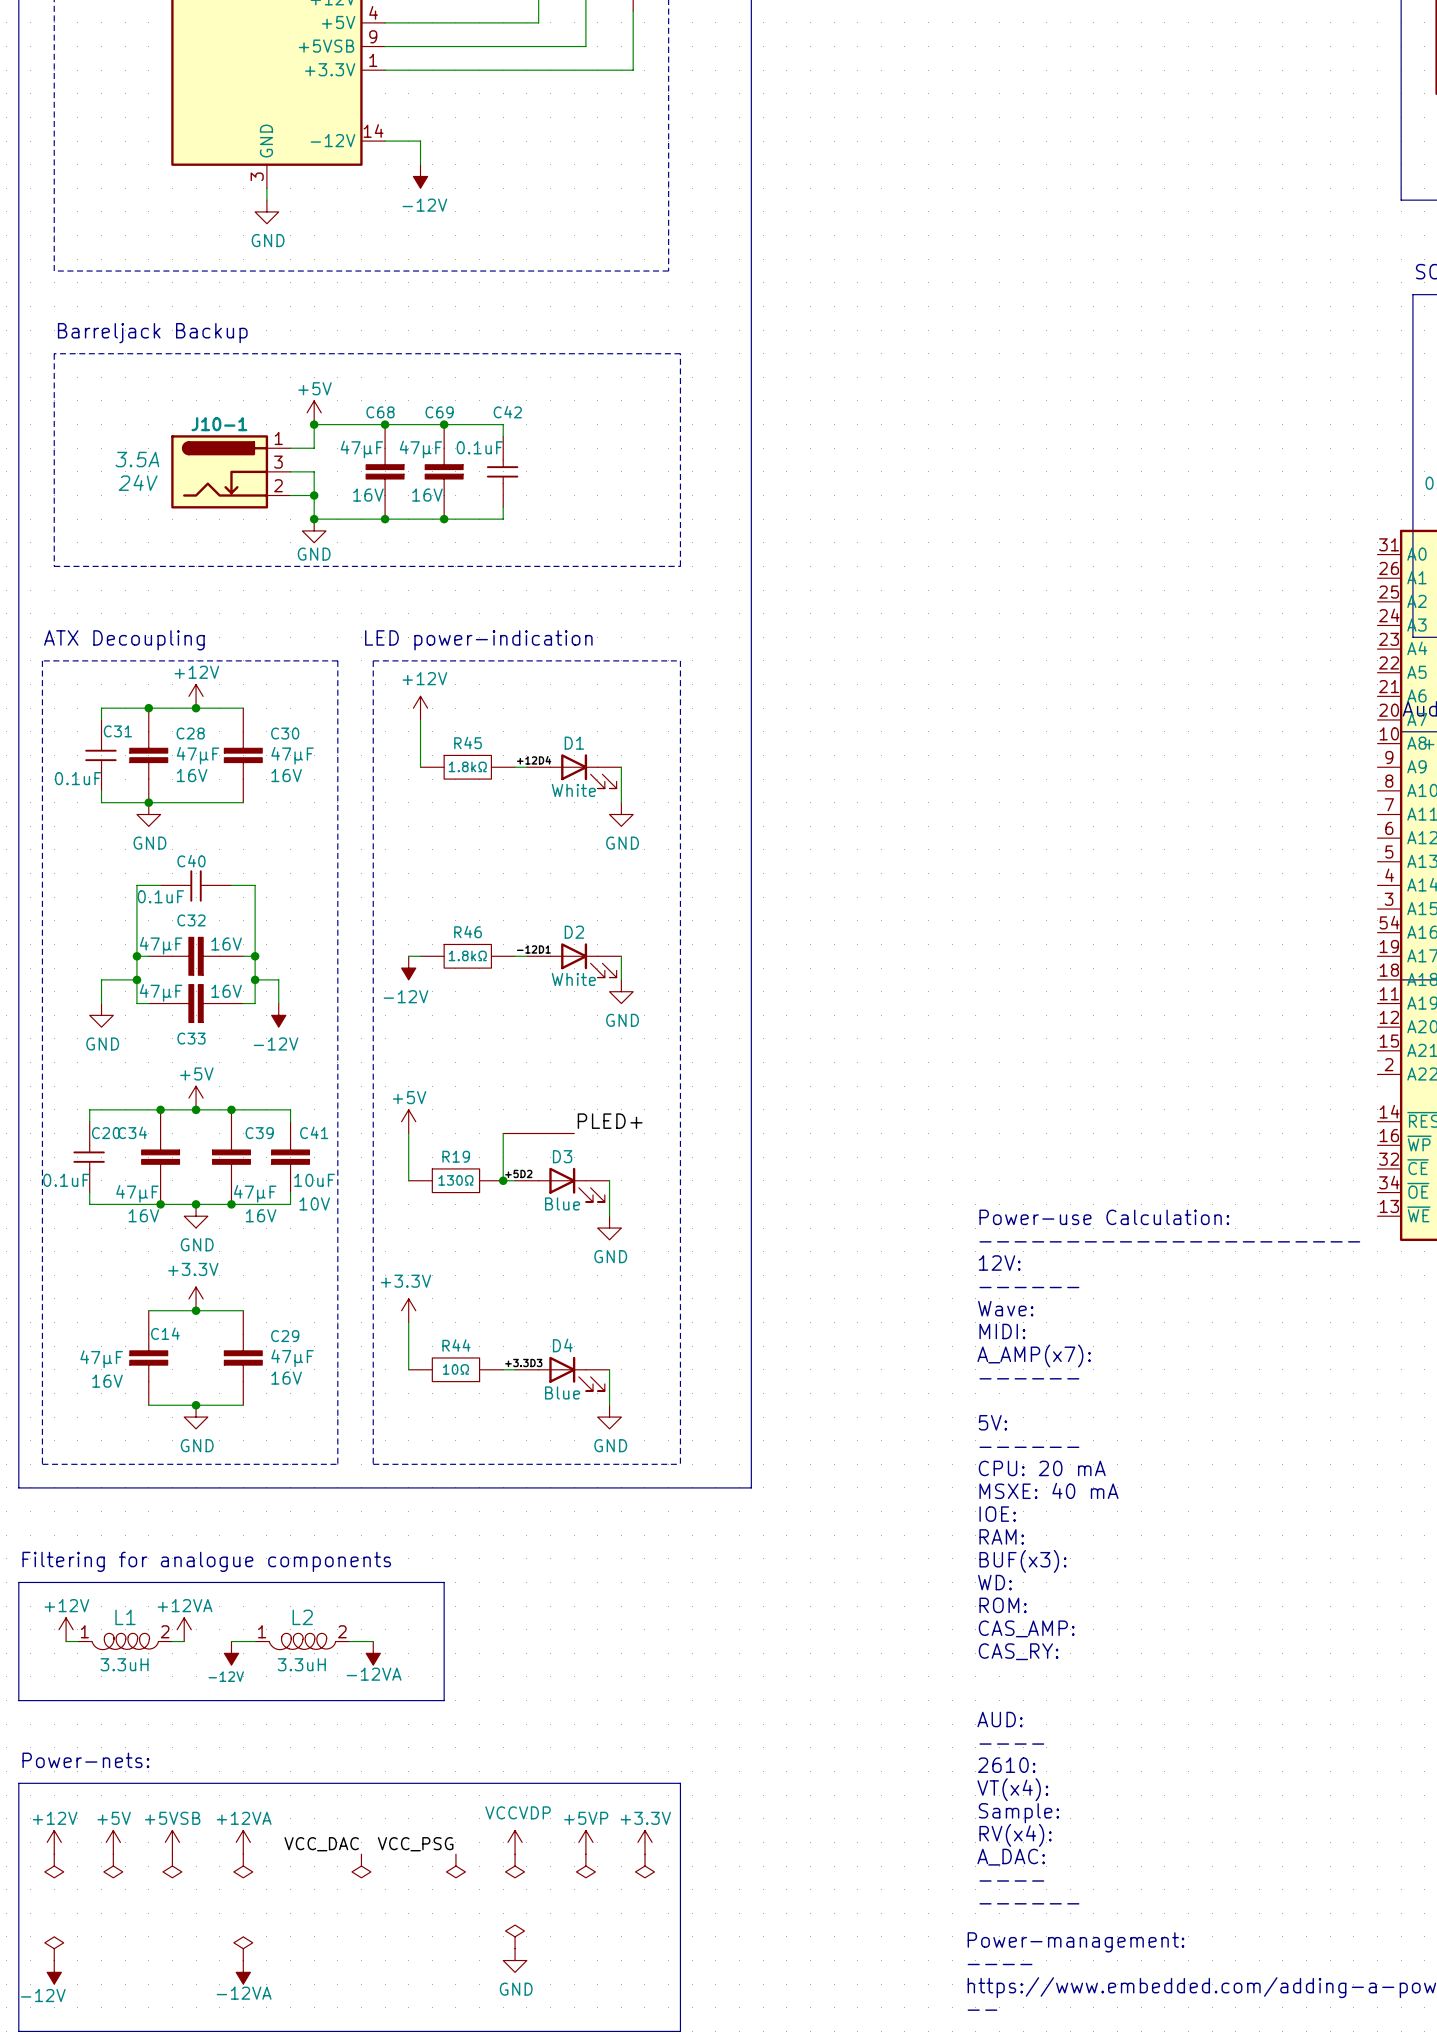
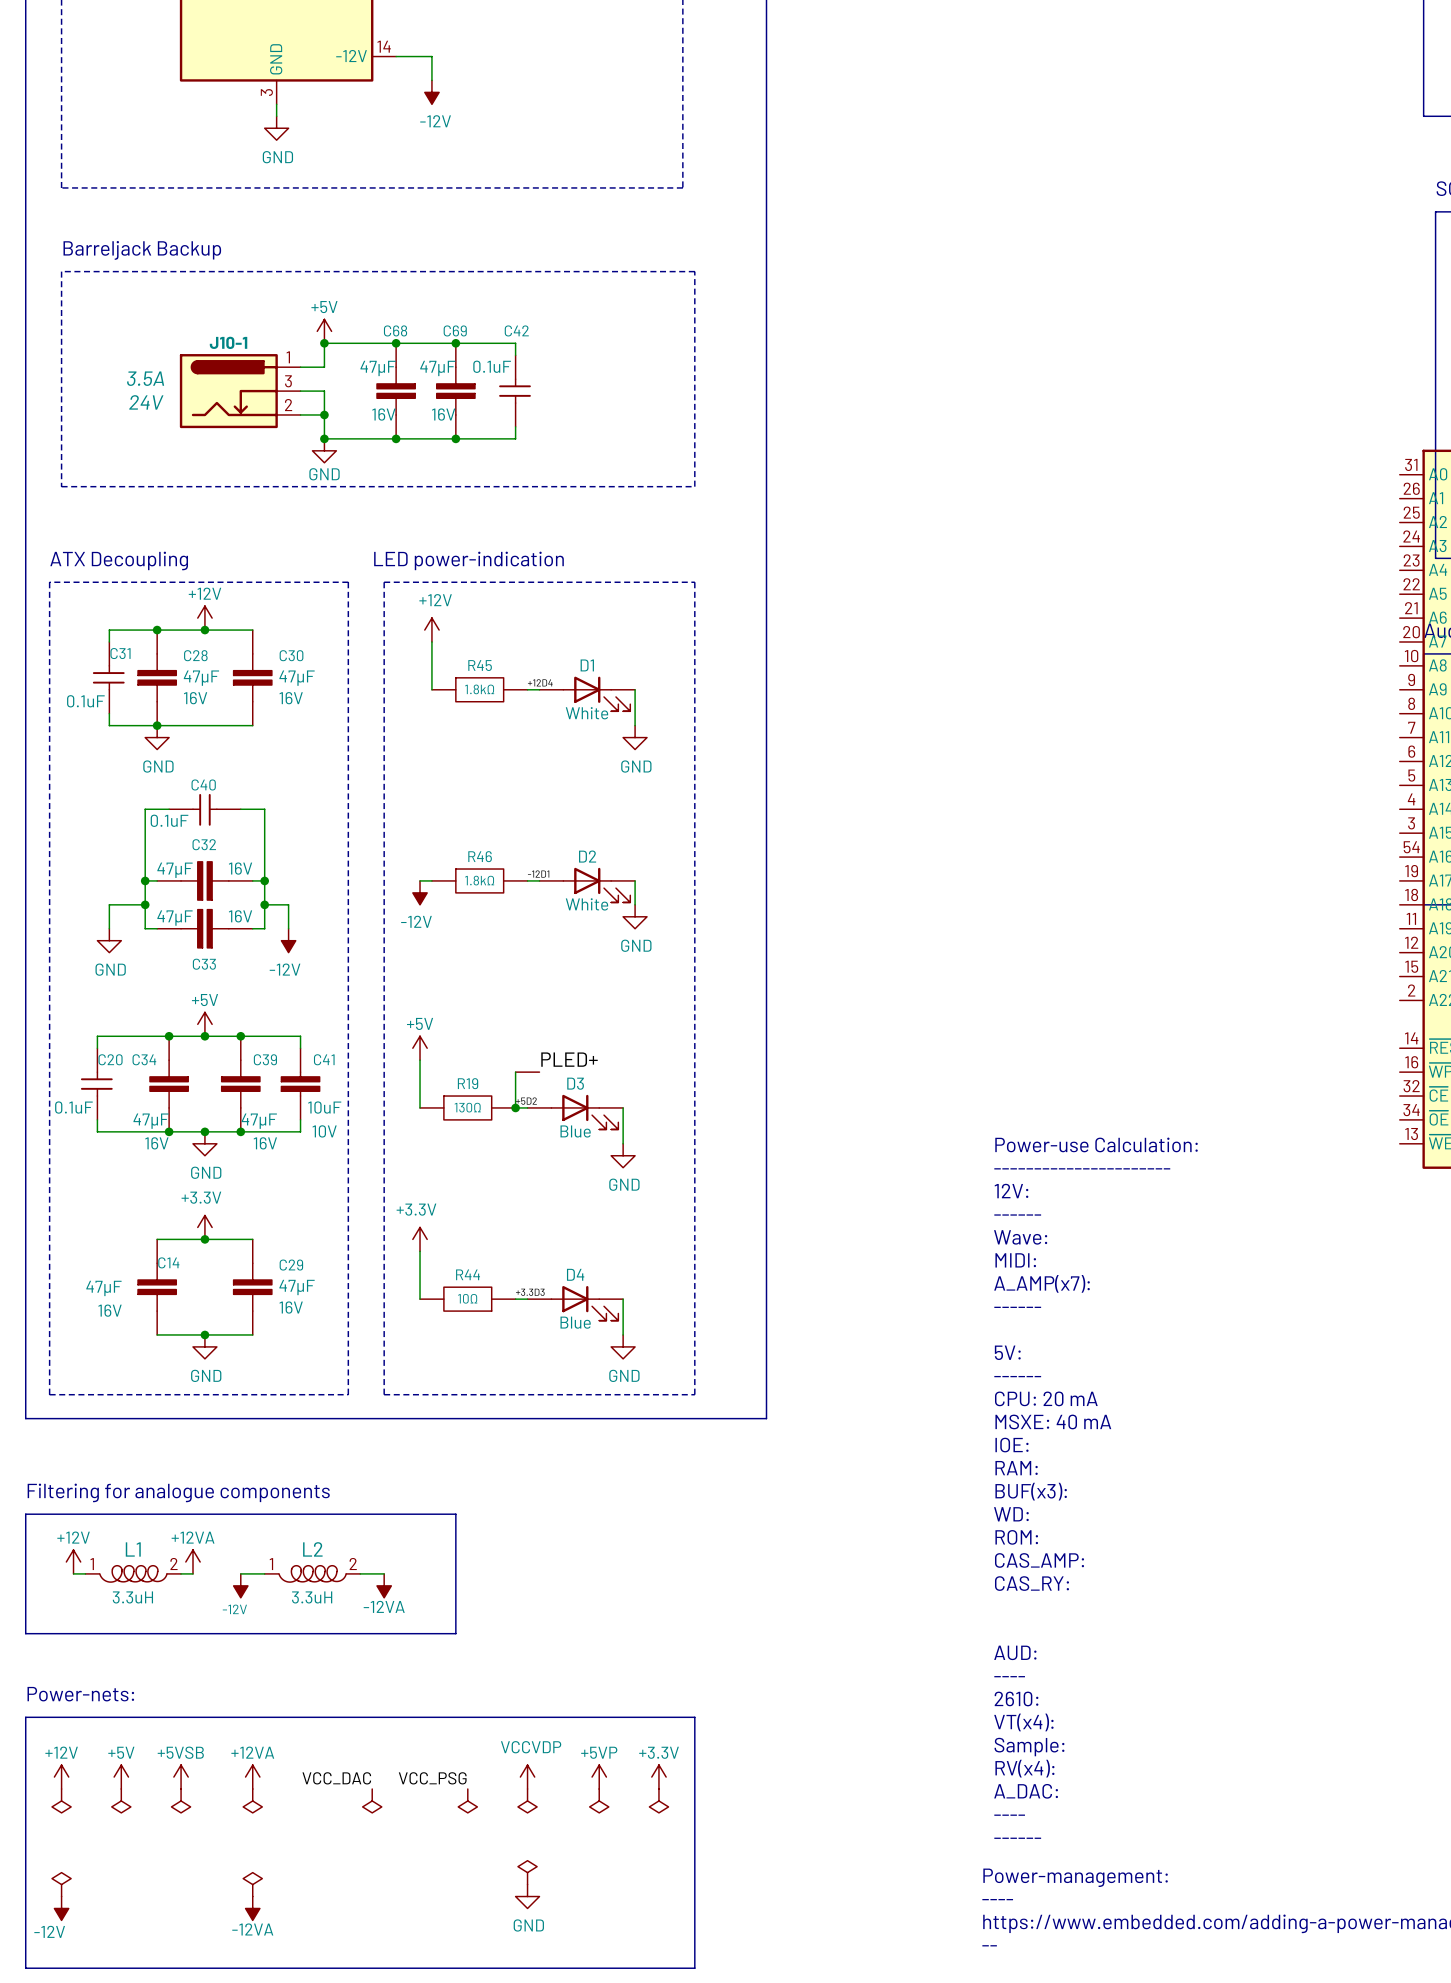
label position: PLED+ (610, 1121) -> PLED+ (569, 1059)
wire: (503, 1133) (503, 1145) -> none
part: (538, 1133) -> none
part: none -> (527, 1072)

